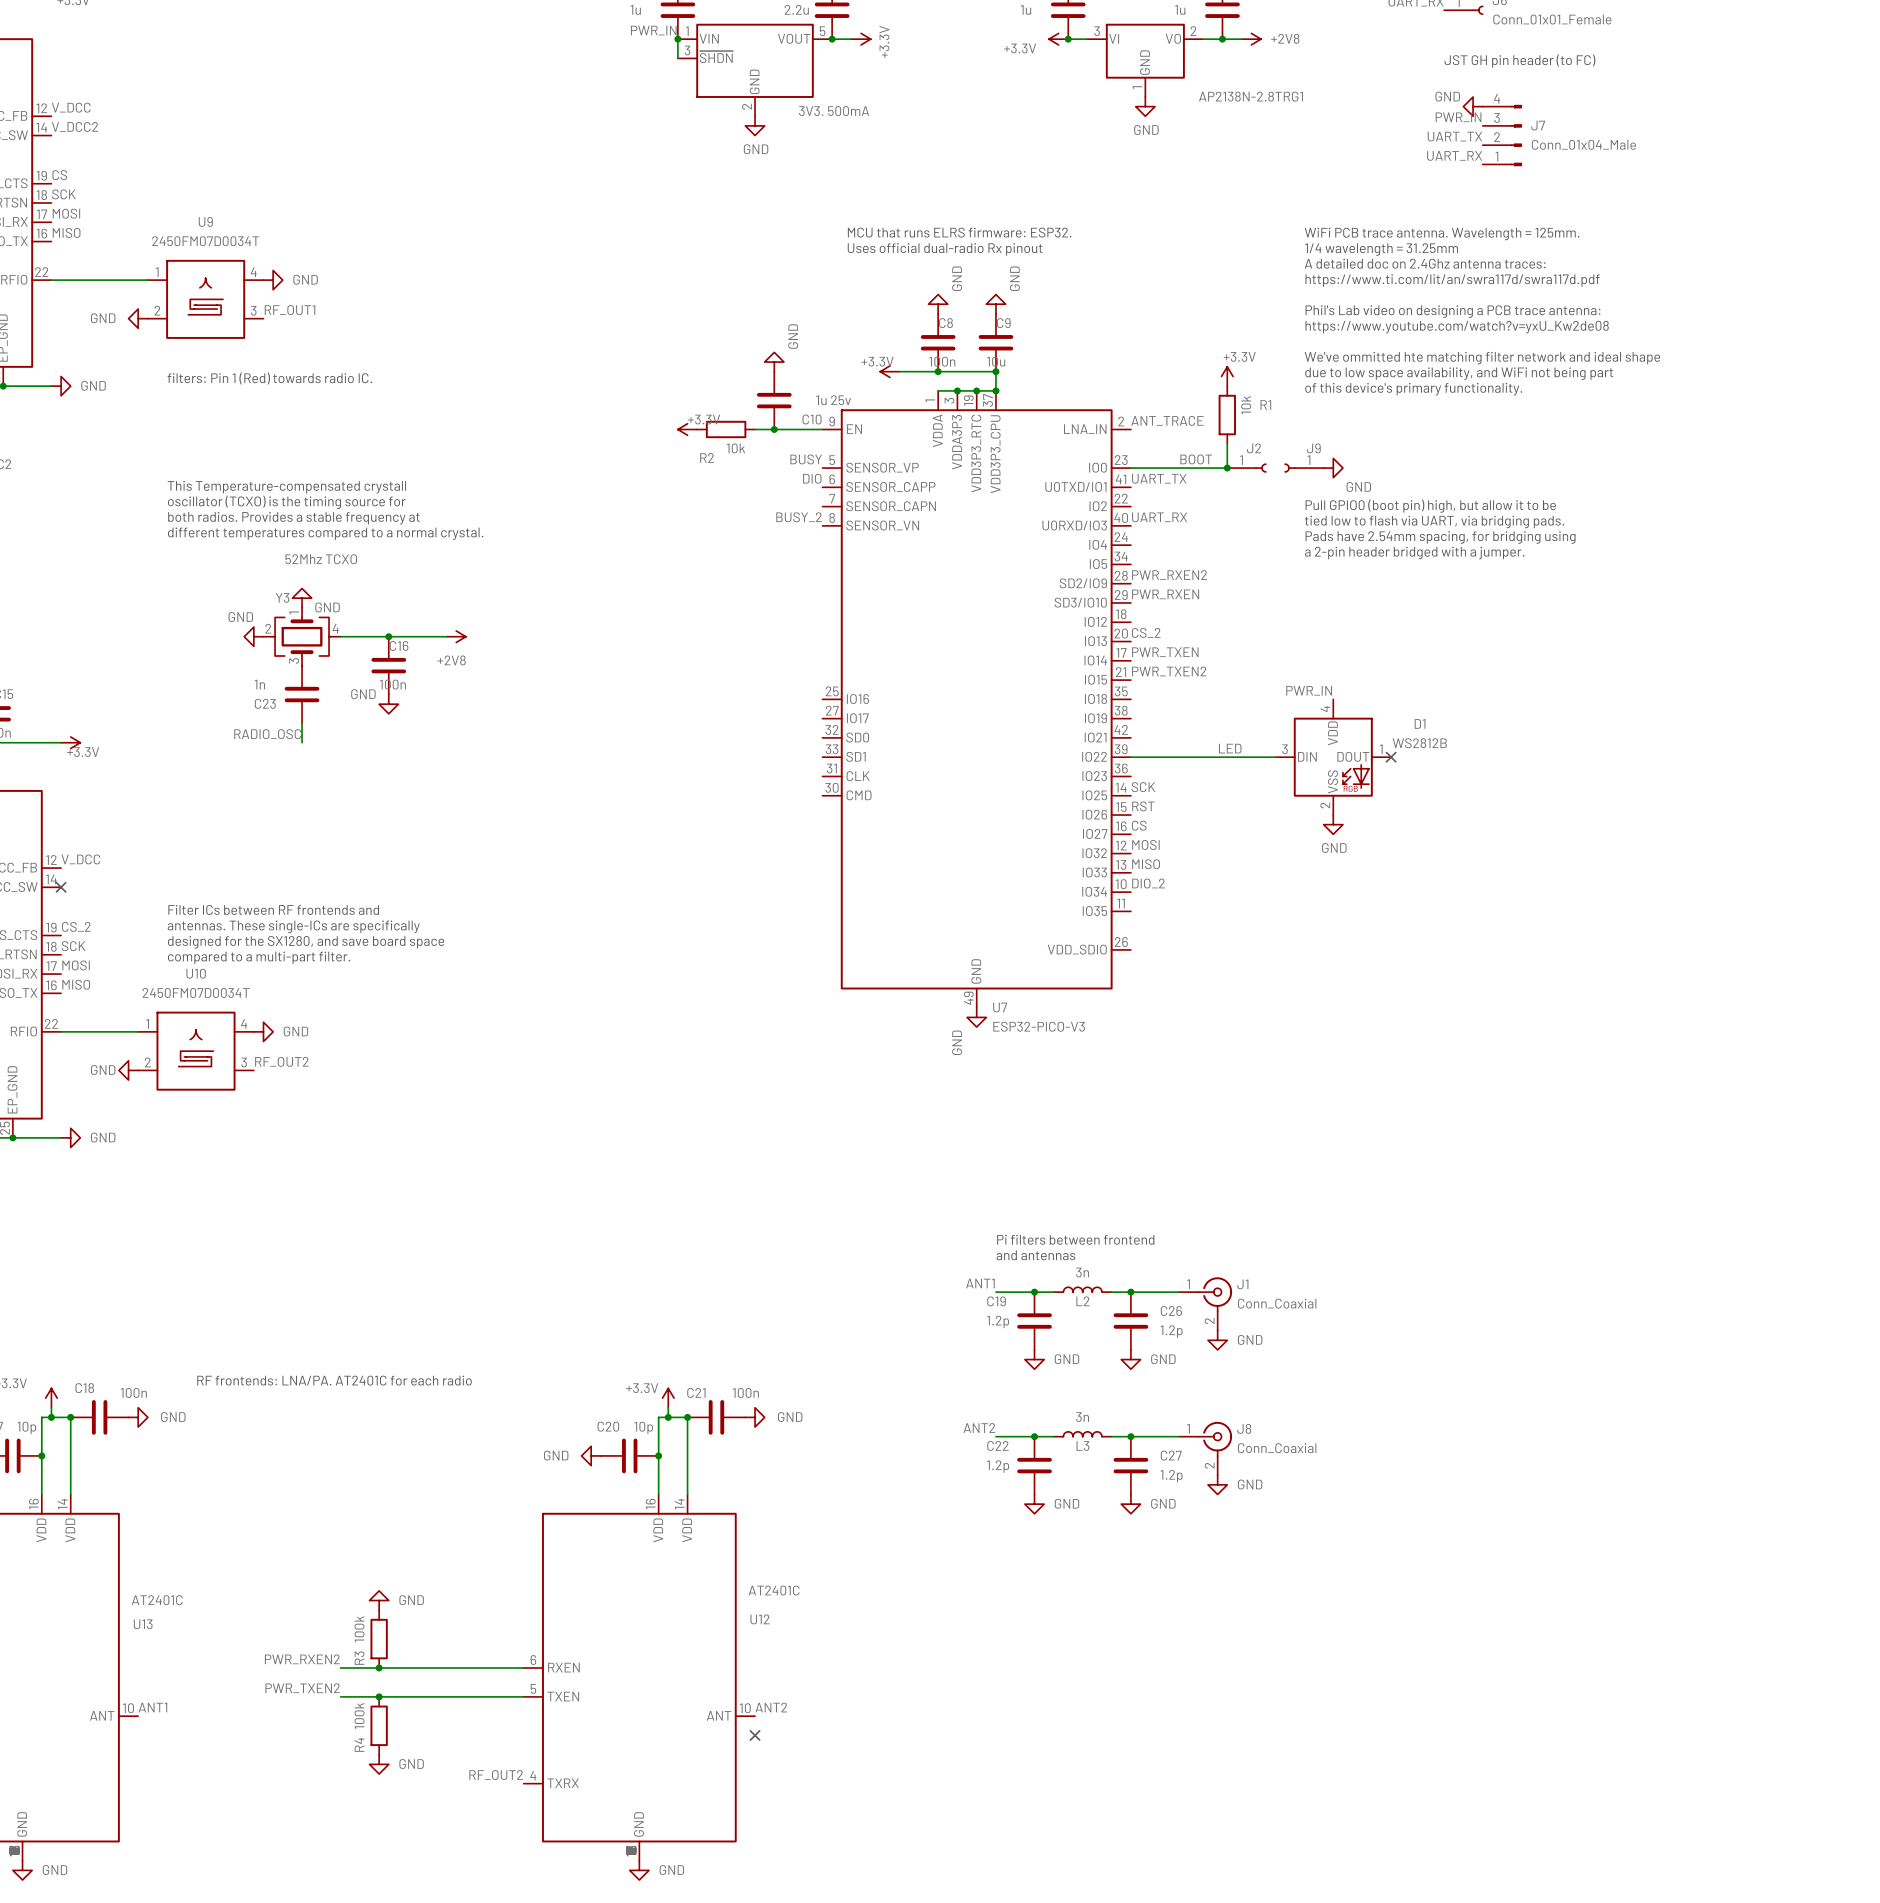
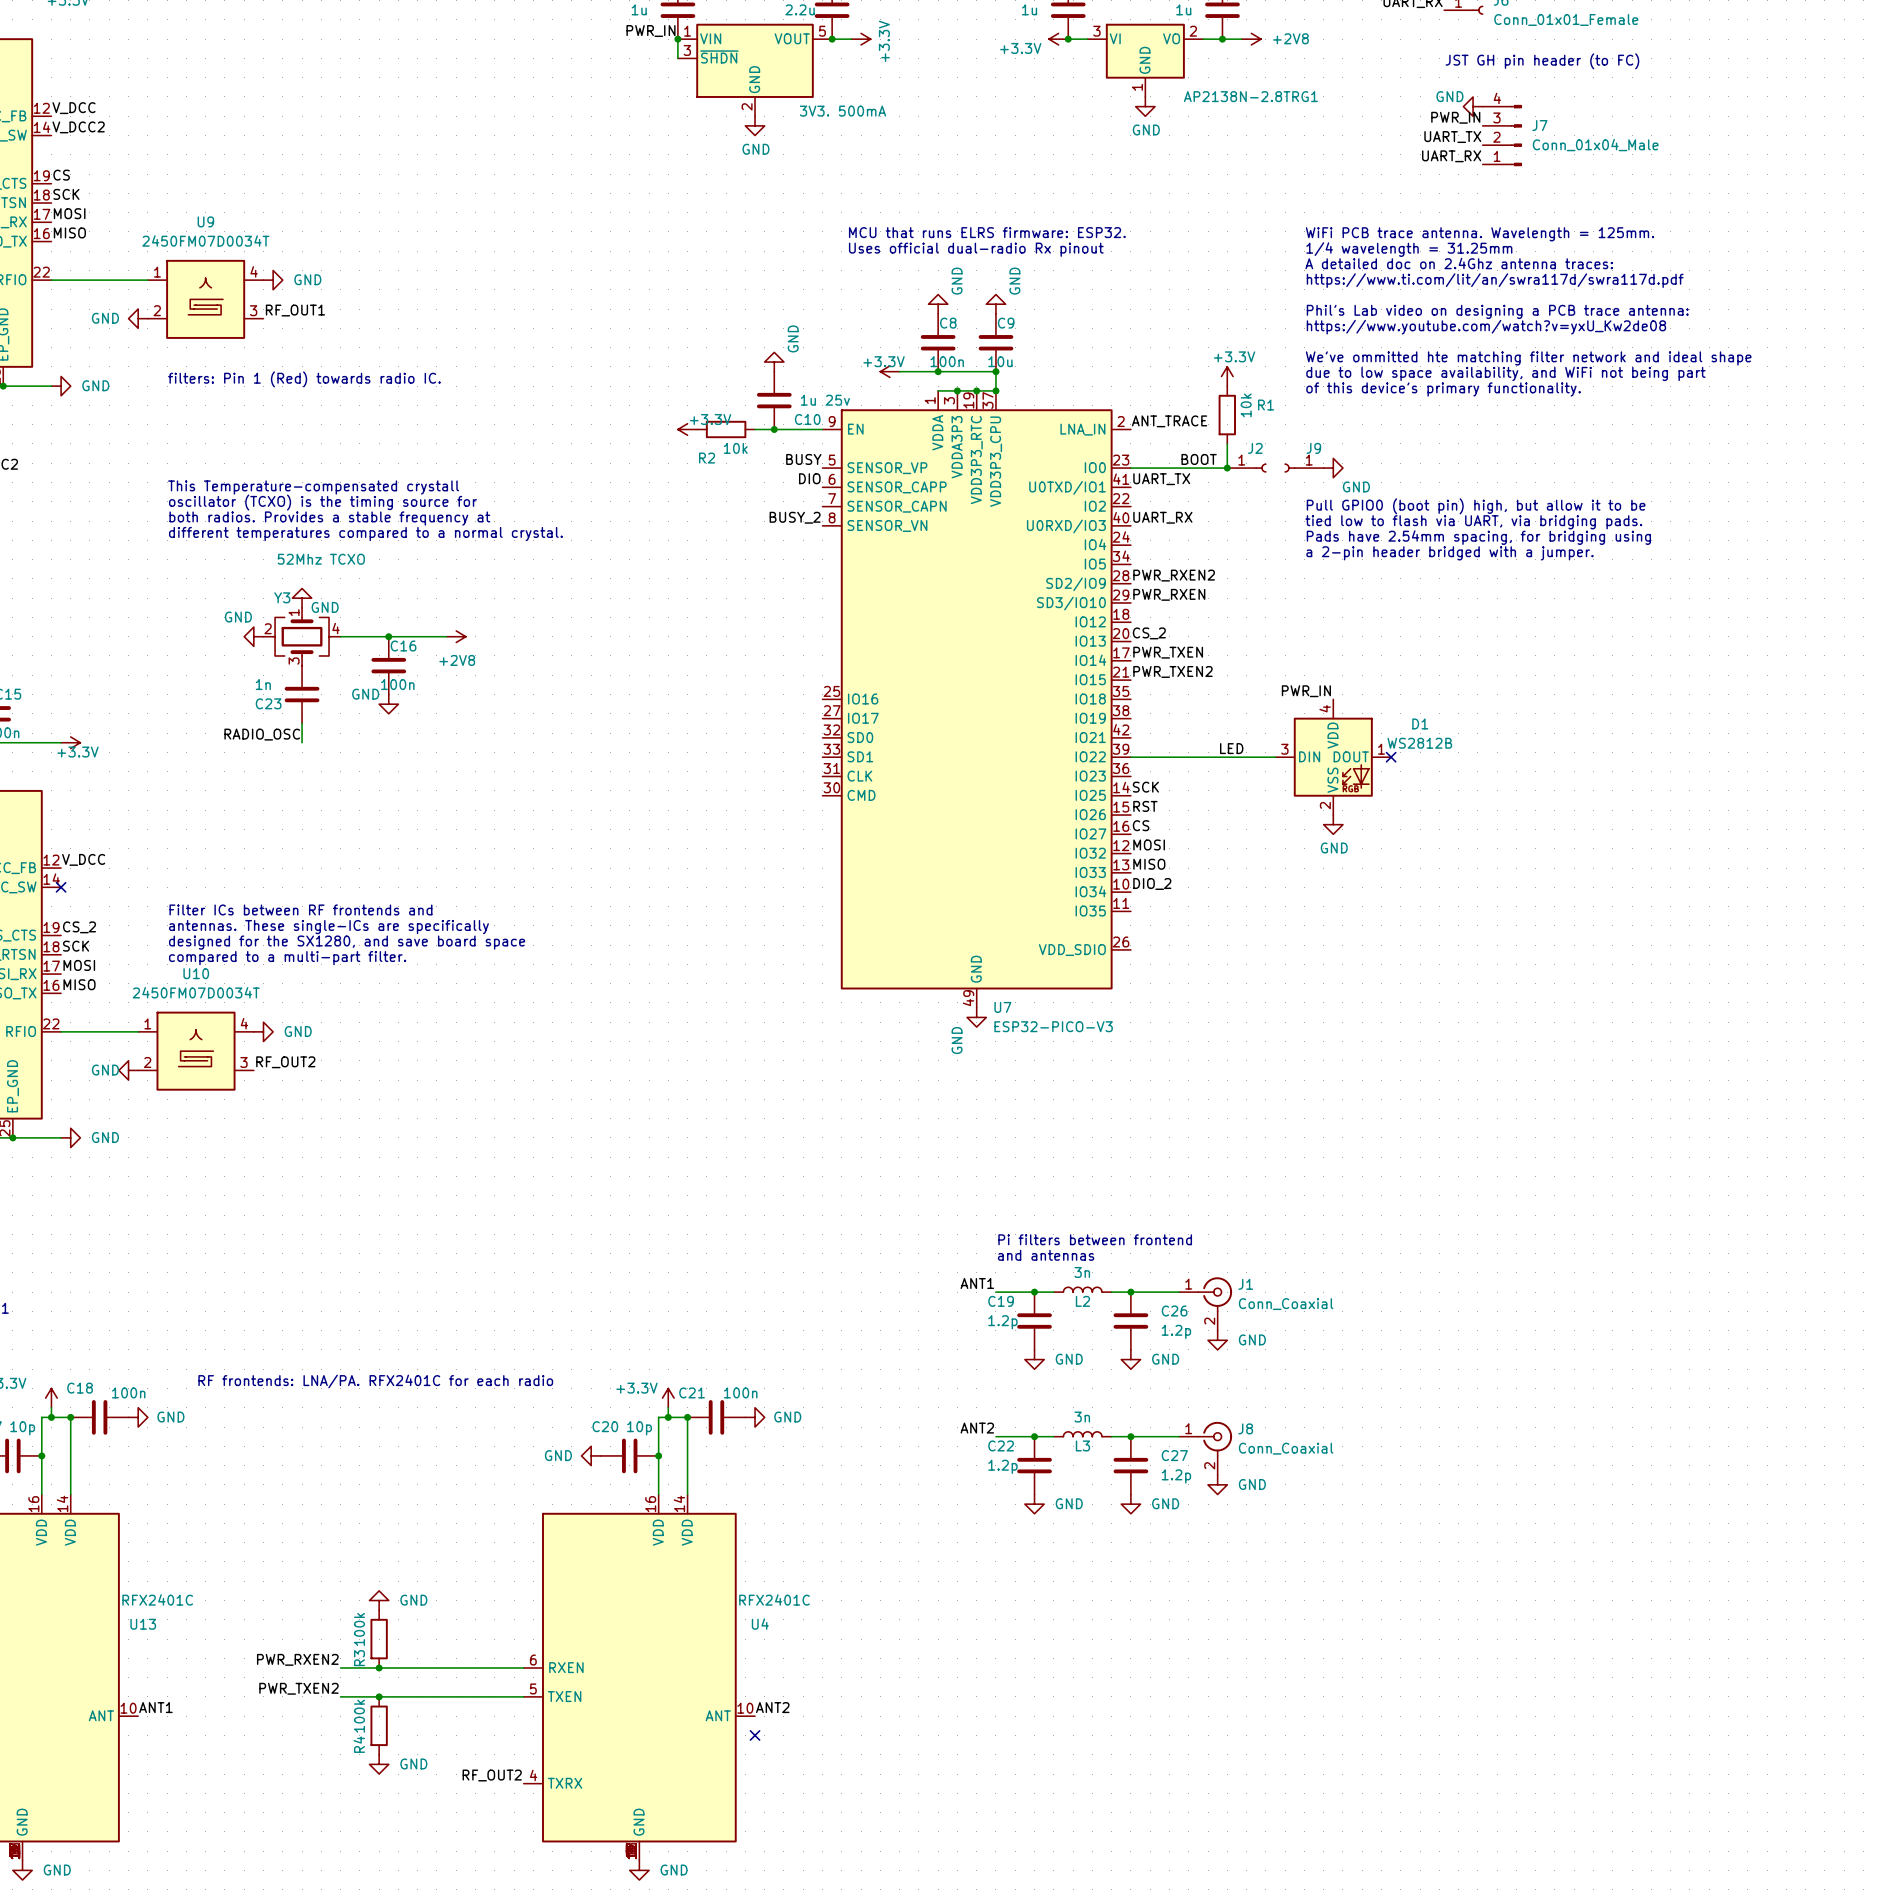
text: RF frontends: LNA/PA. AT2401C for each radio (334, 1380) -> RF frontends: LNA/PA. RFX2401C for each radio (375, 1381)
U12 value: AT2401C (774, 1590) -> RFX2401C (774, 1599)
U13 value: AT2401C (157, 1600) -> RFX2401C (157, 1599)
U12 name: U12 (760, 1619) -> U4 (760, 1624)

